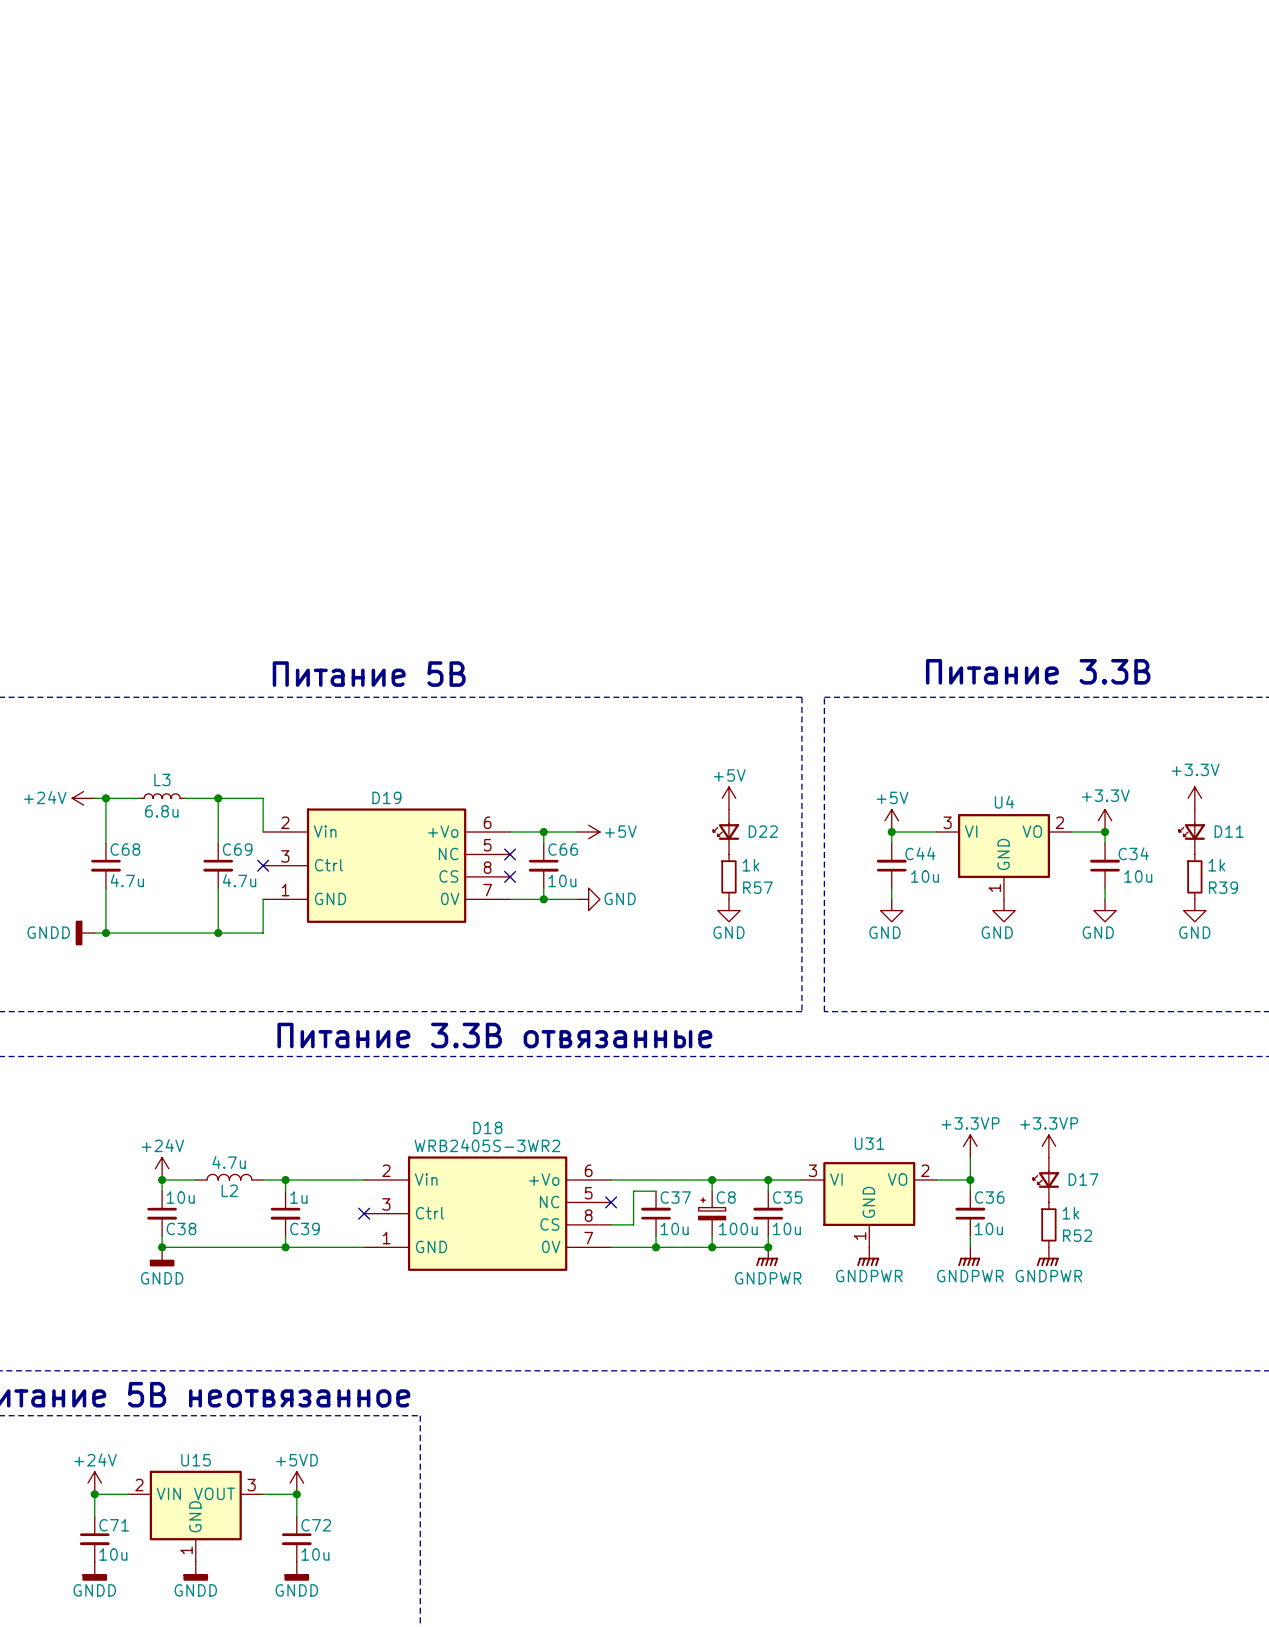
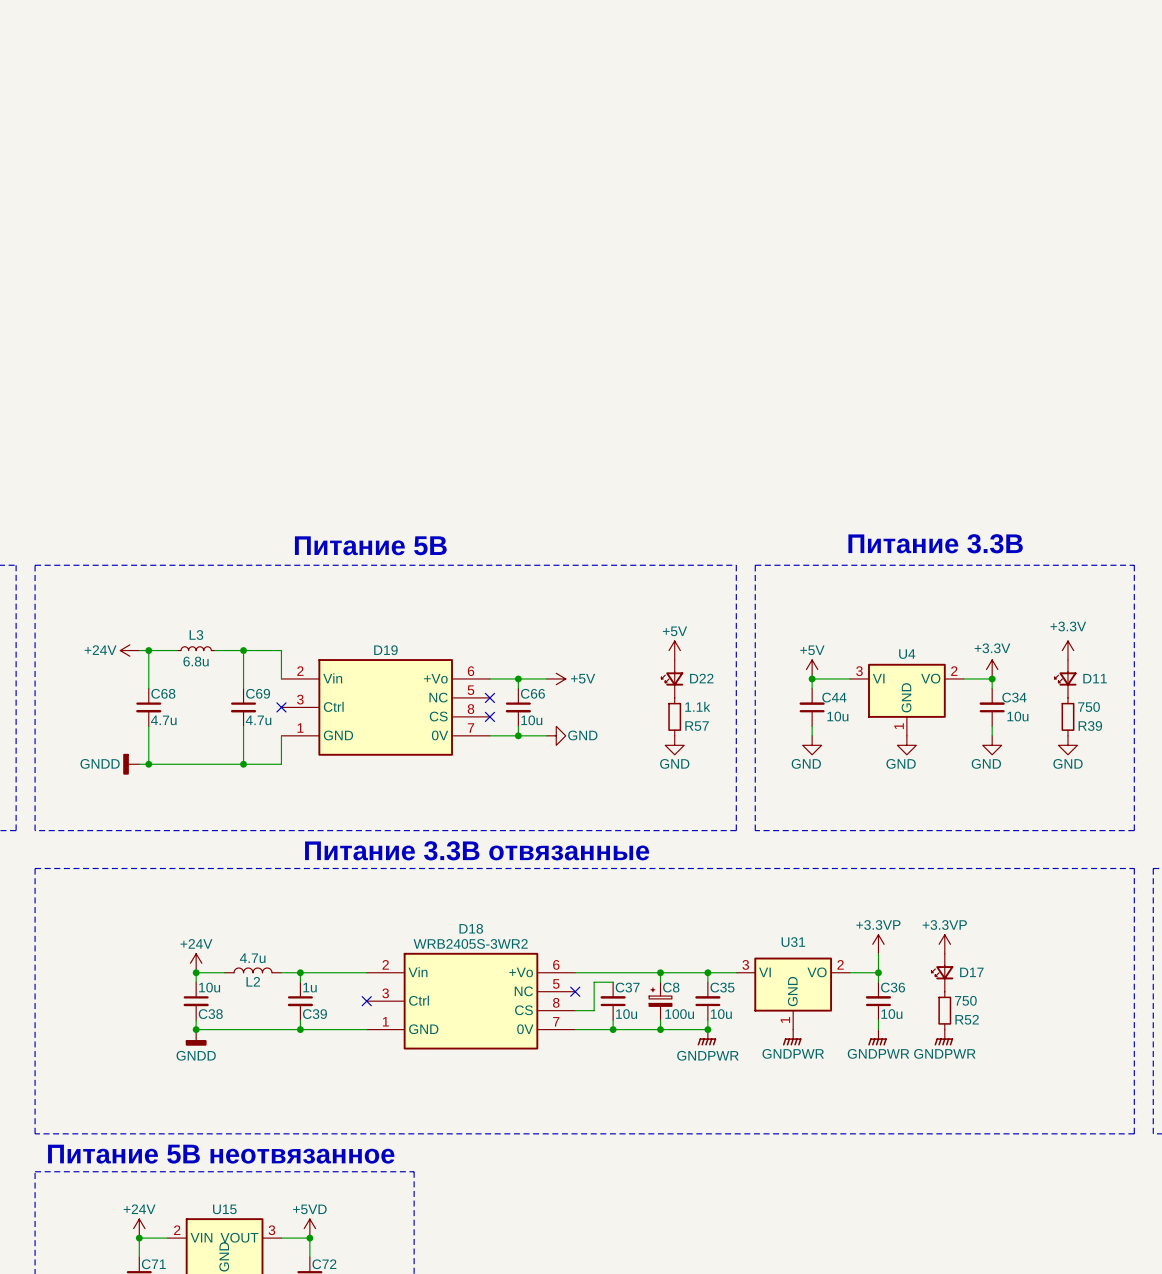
R57 value: 1k (750, 865) -> 1.1k (697, 706)
R39 value: 1k (1216, 865) -> 750 (1089, 707)
R52 value: 1k (1070, 1213) -> 750 (965, 1000)

